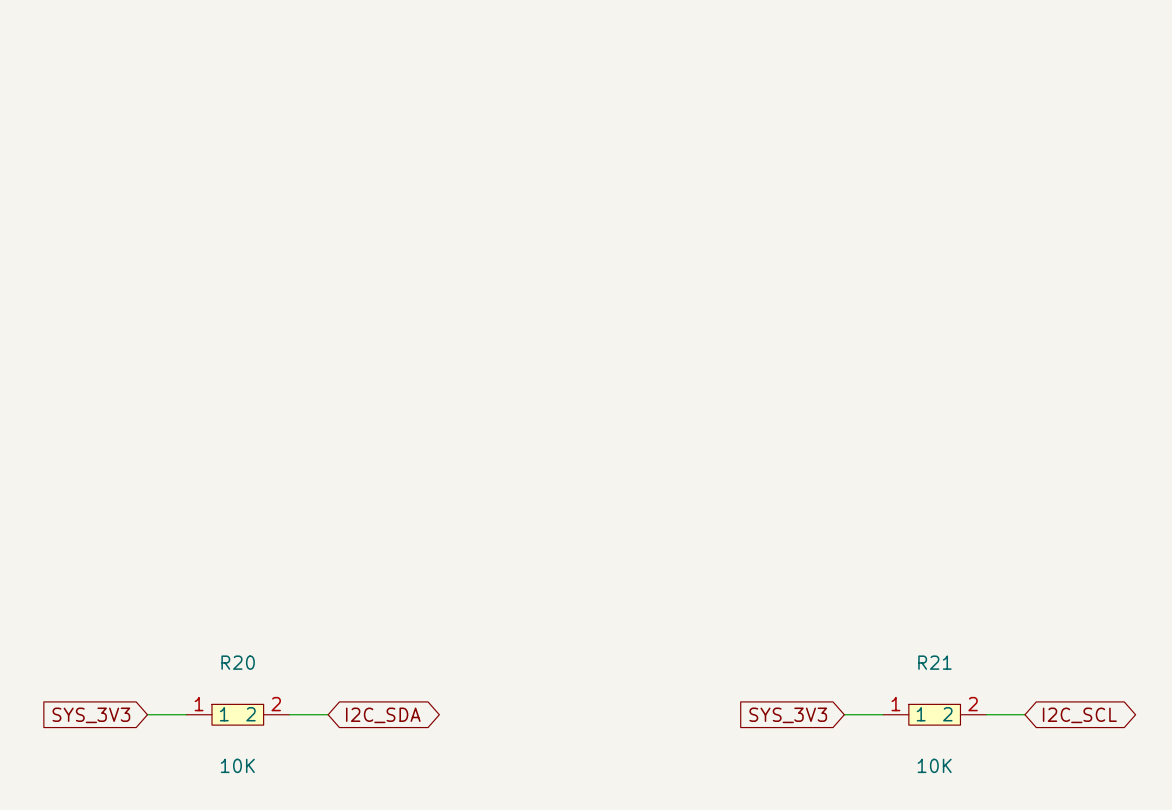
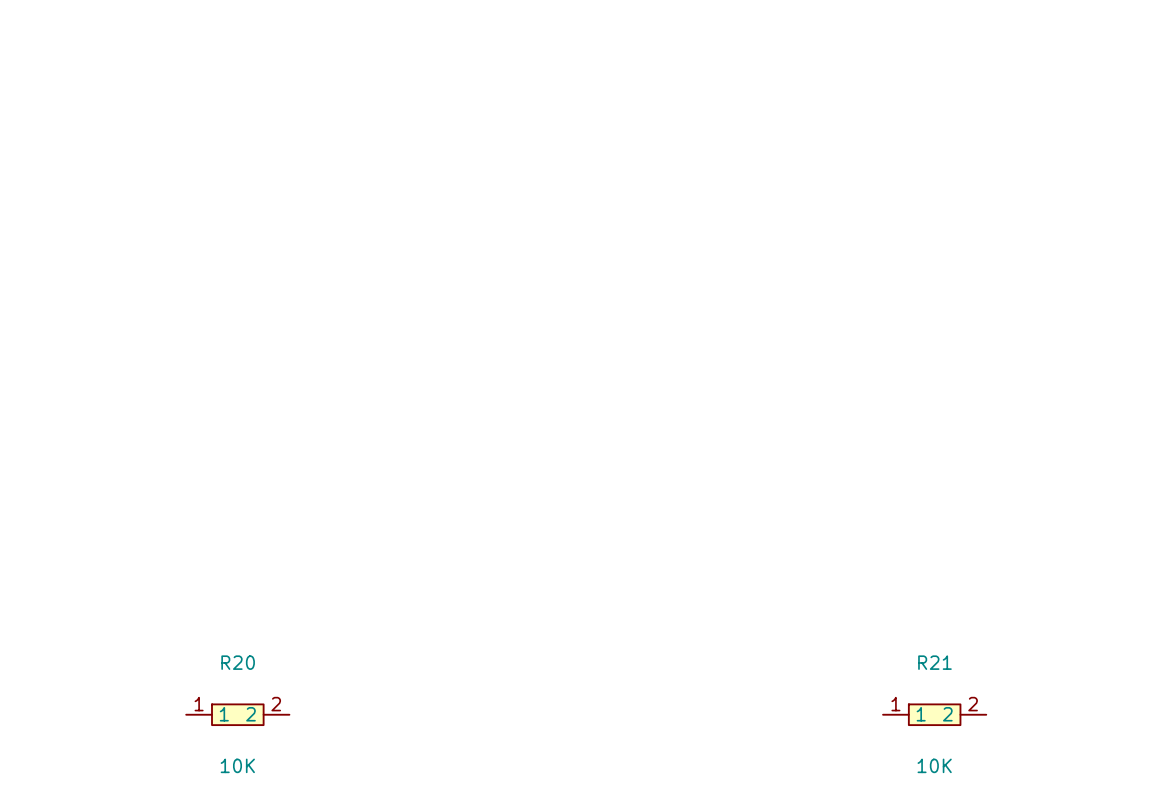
wire: (147, 714) (186, 714) -> none
wire: (289, 714) (328, 714) -> none
wire: (844, 714) (883, 714) -> none
wire: (986, 714) (1024, 714) -> none
global label: SYS_3V3 (91, 715) -> none
global label: I2C_SDA (383, 715) -> none
global label: SYS_3V3 (788, 715) -> none
global label: I2C_SCL (1079, 715) -> none

